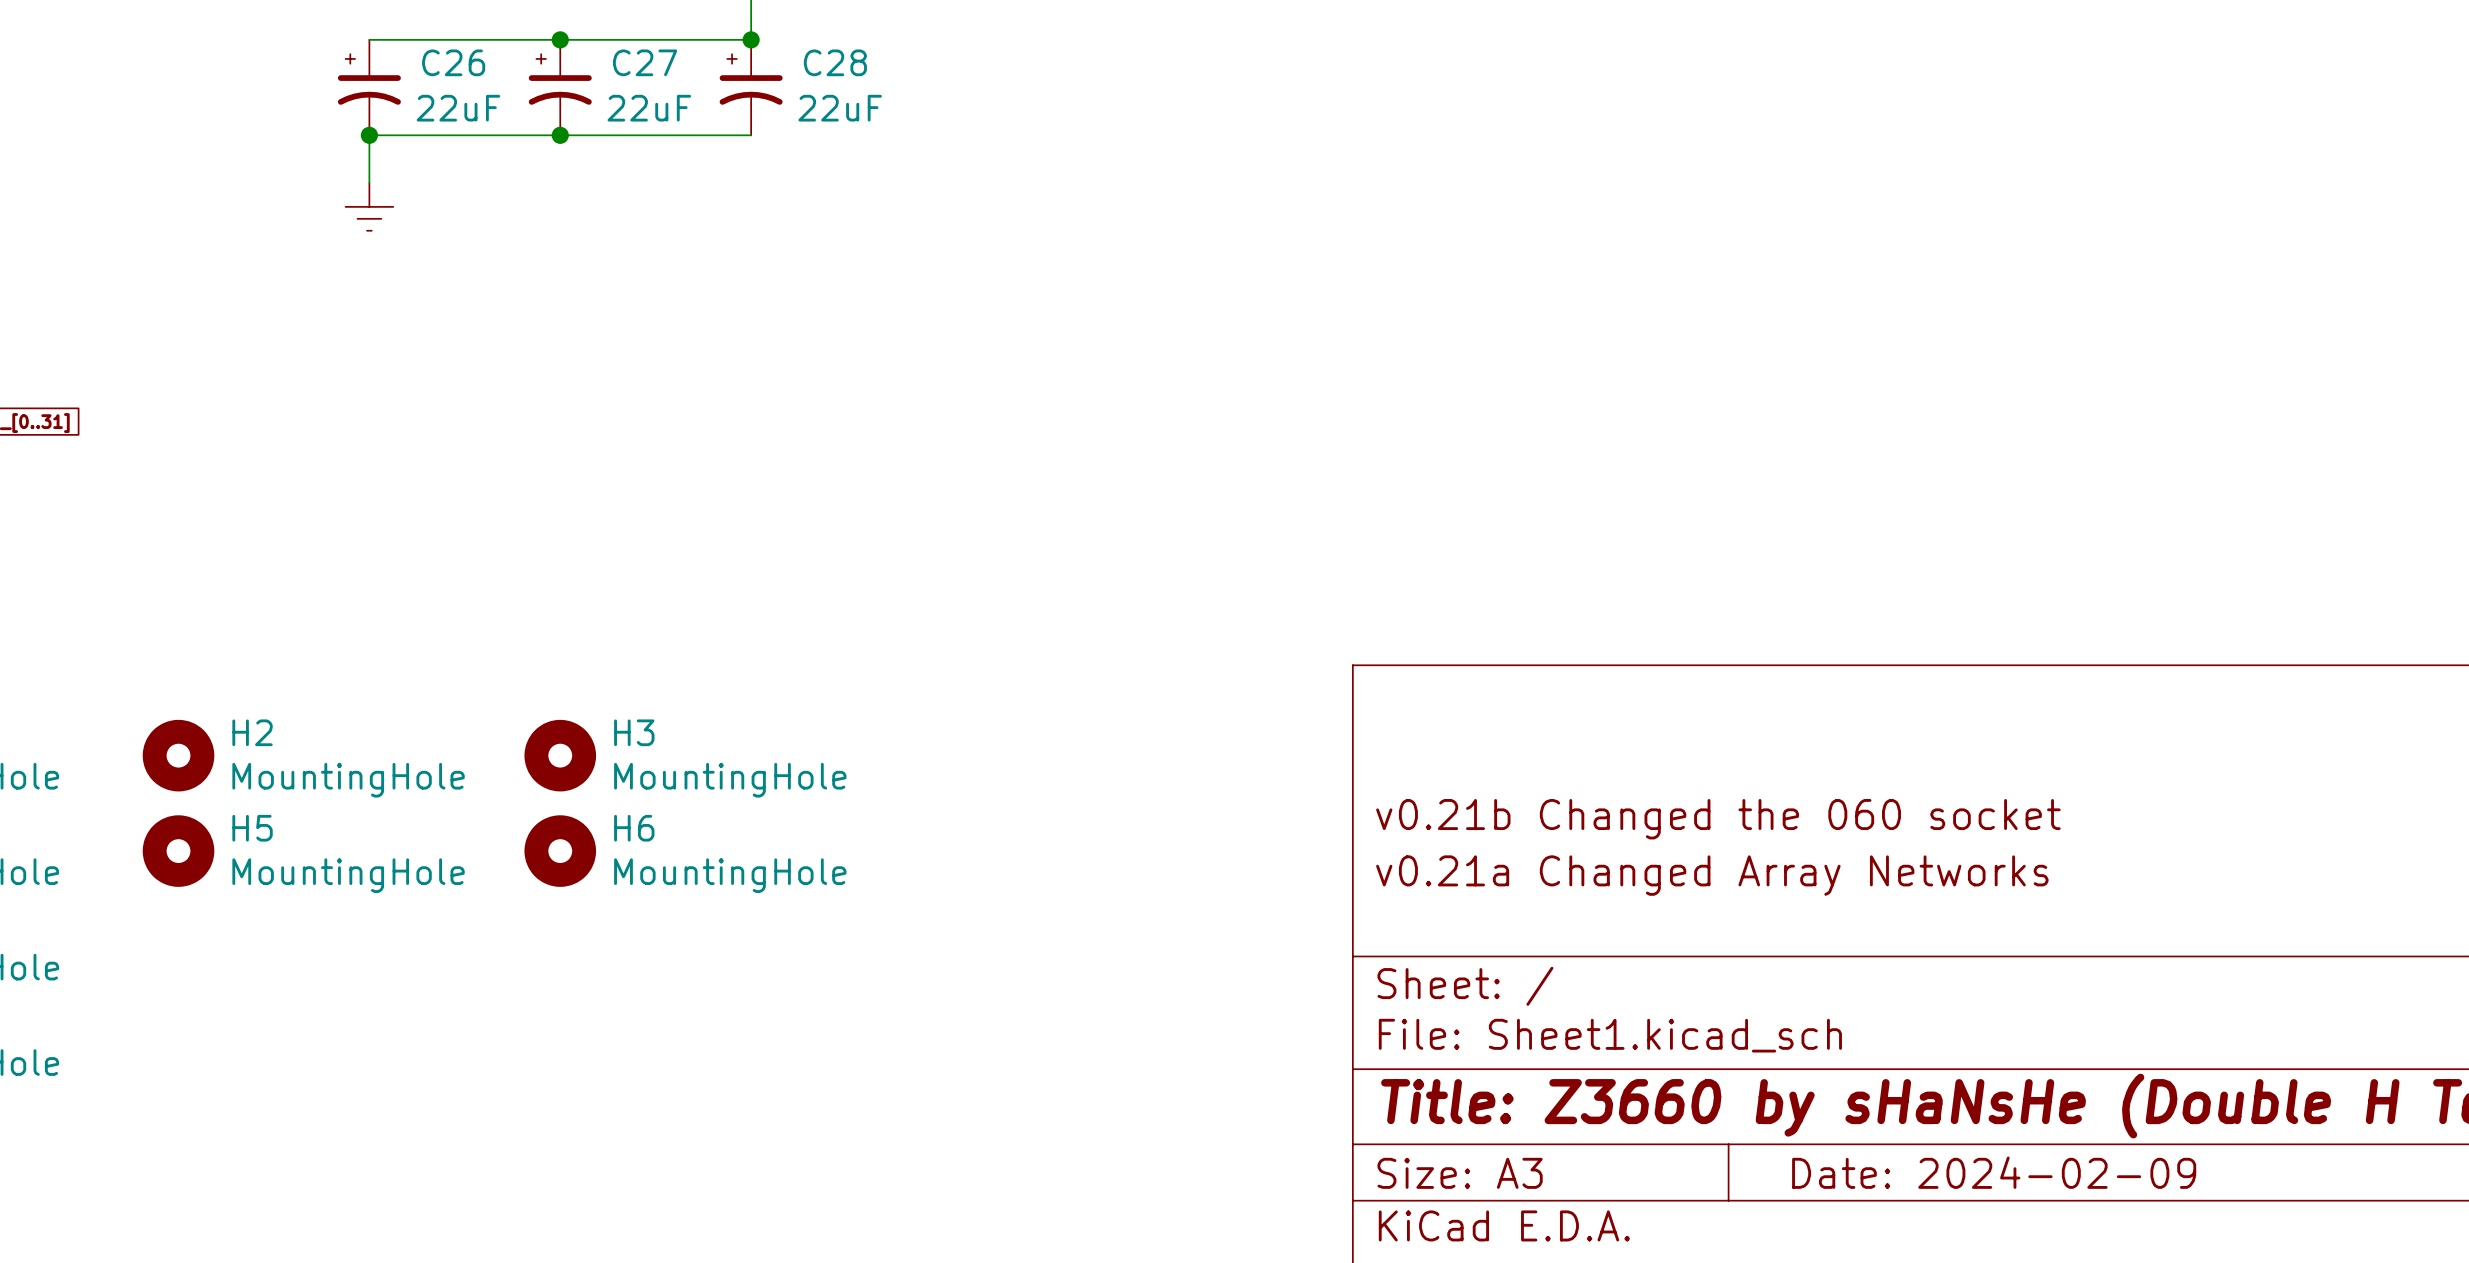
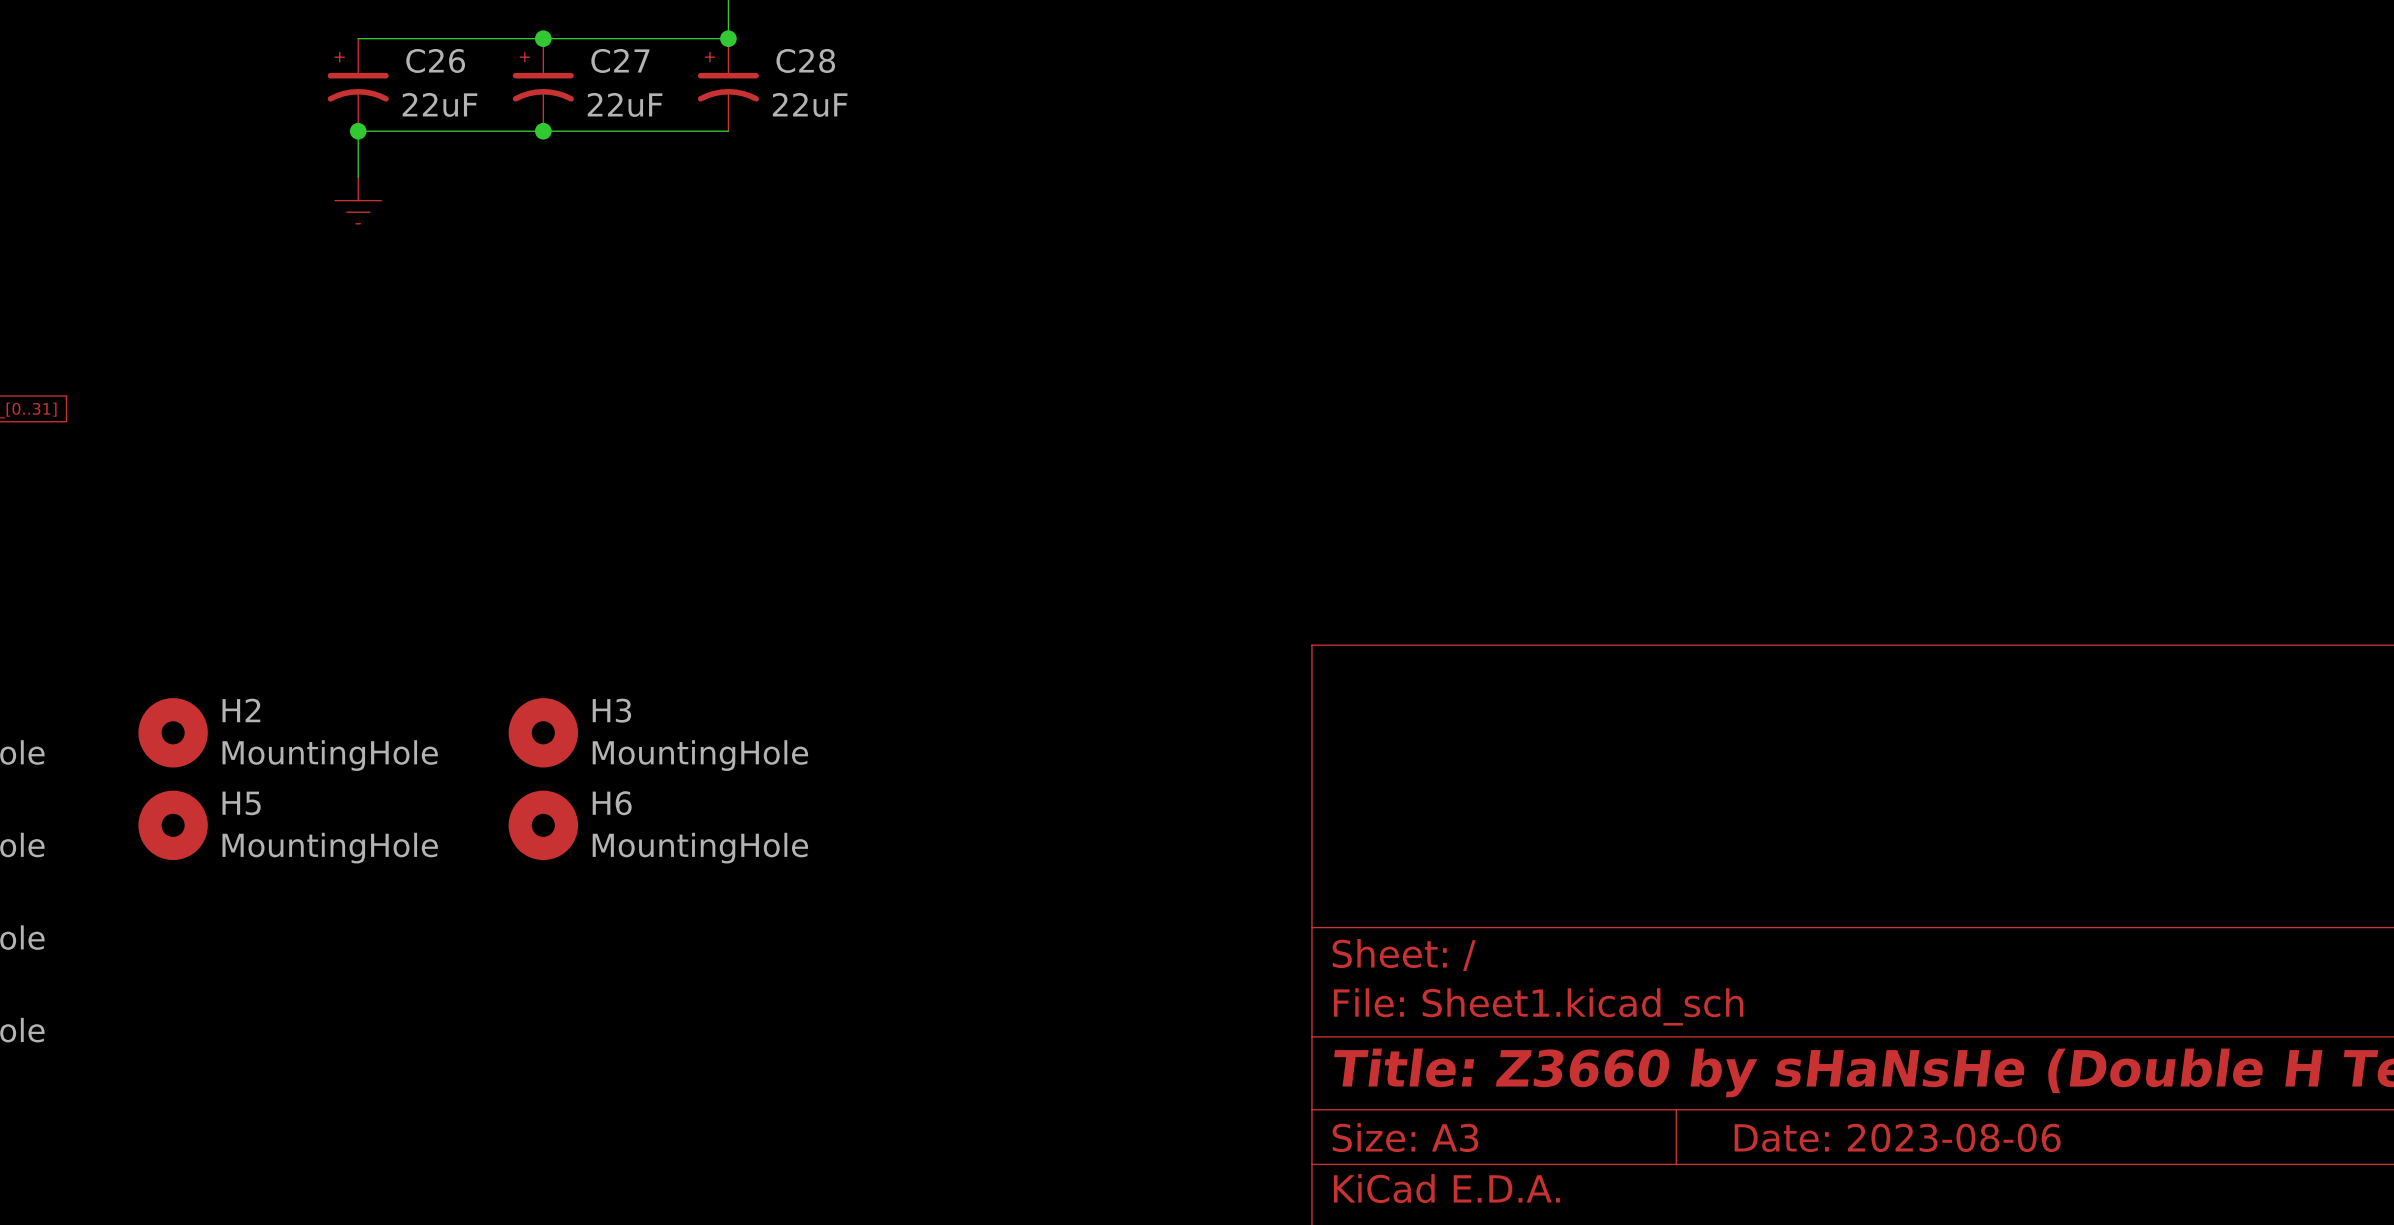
title block: v0.21b Changed the 060 socket (1718, 819) -> none
title block: v0.21a Changed Array Networks (1712, 875) -> none
title block: Date: 2024-02-09 (1994, 1172) -> Date: 2023-08-06 (1897, 1137)

